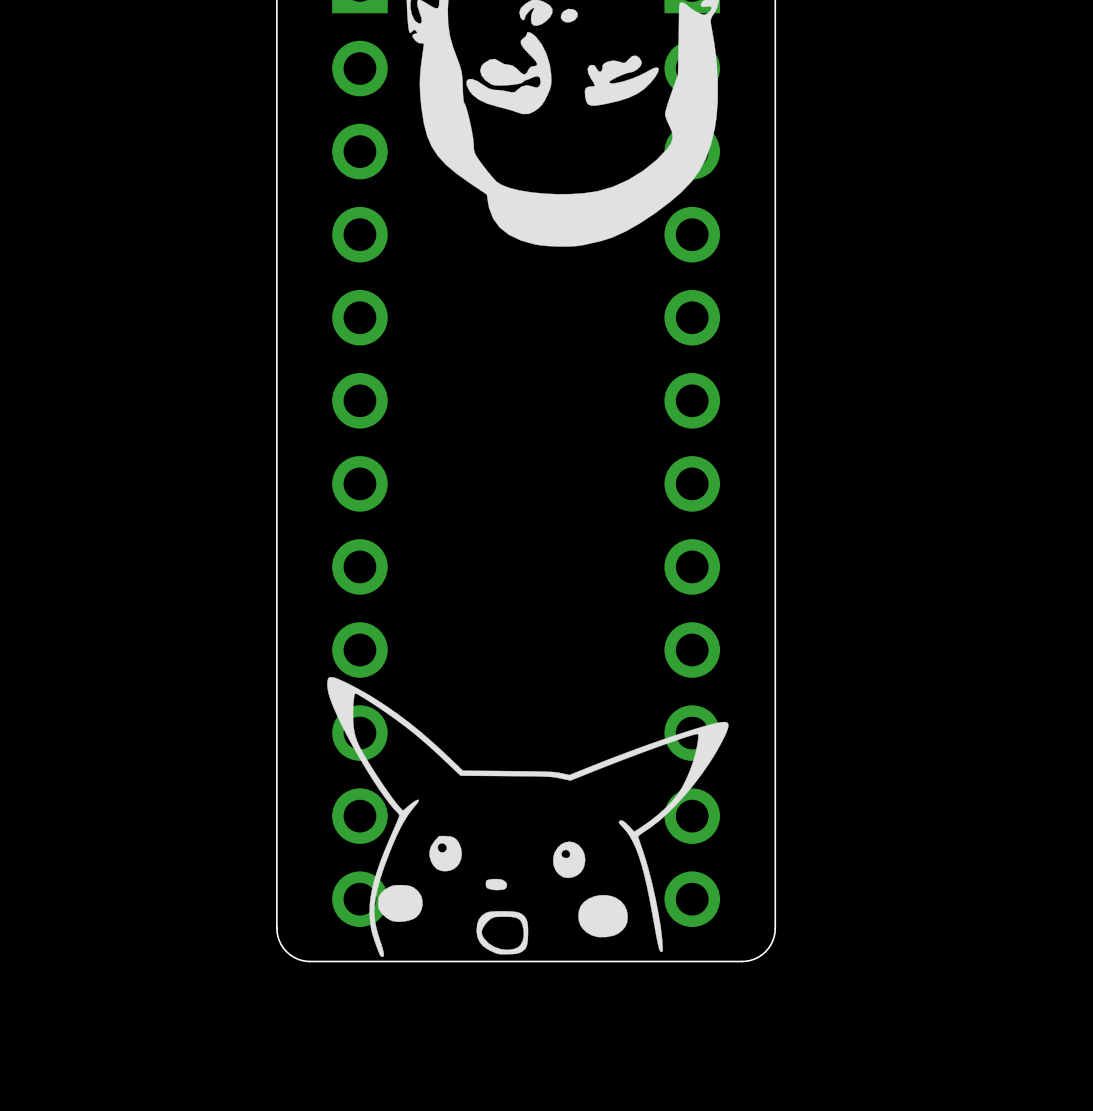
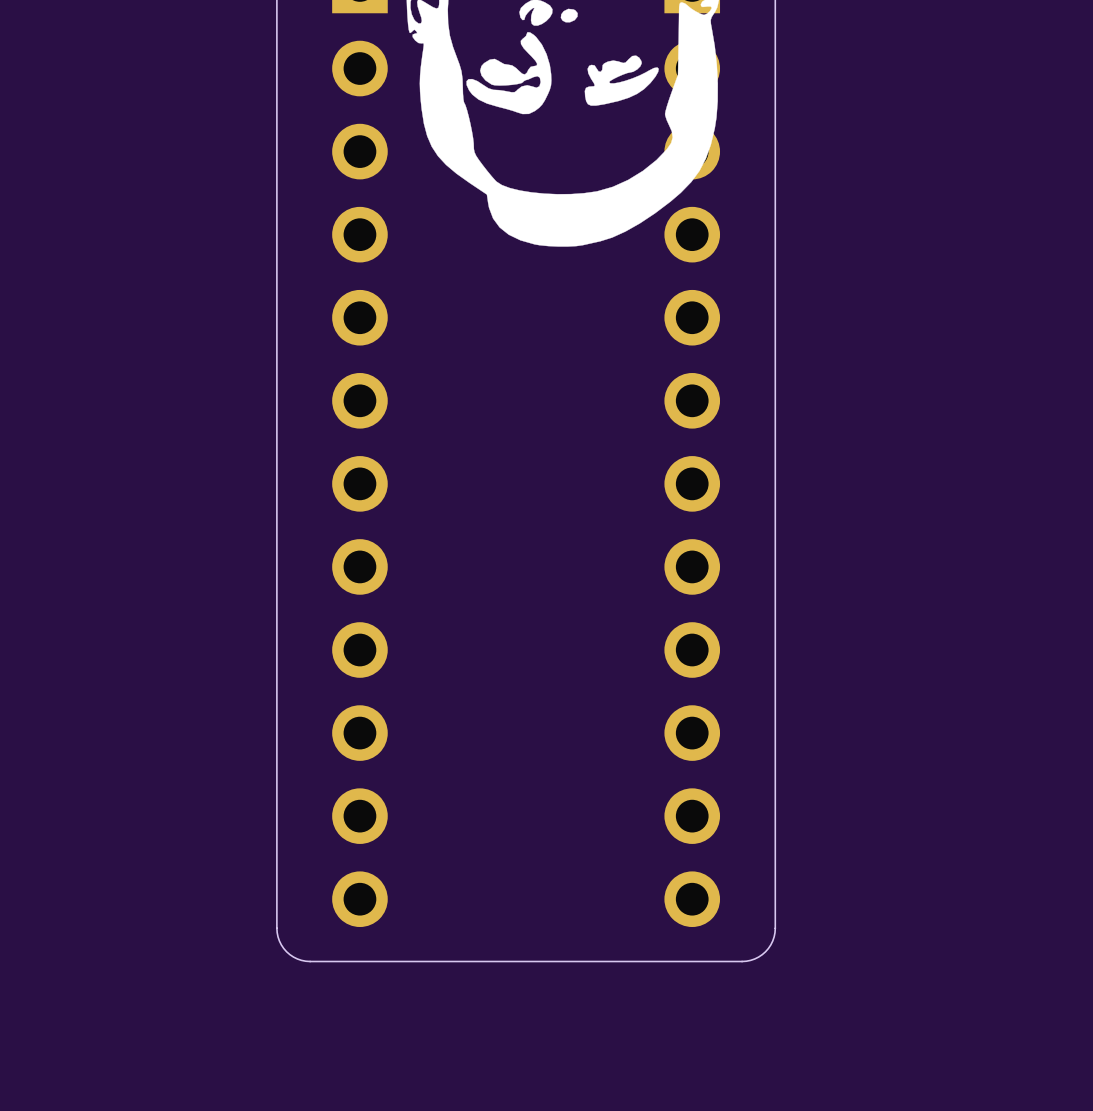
drawing: [327, 676, 729, 958] -> none

